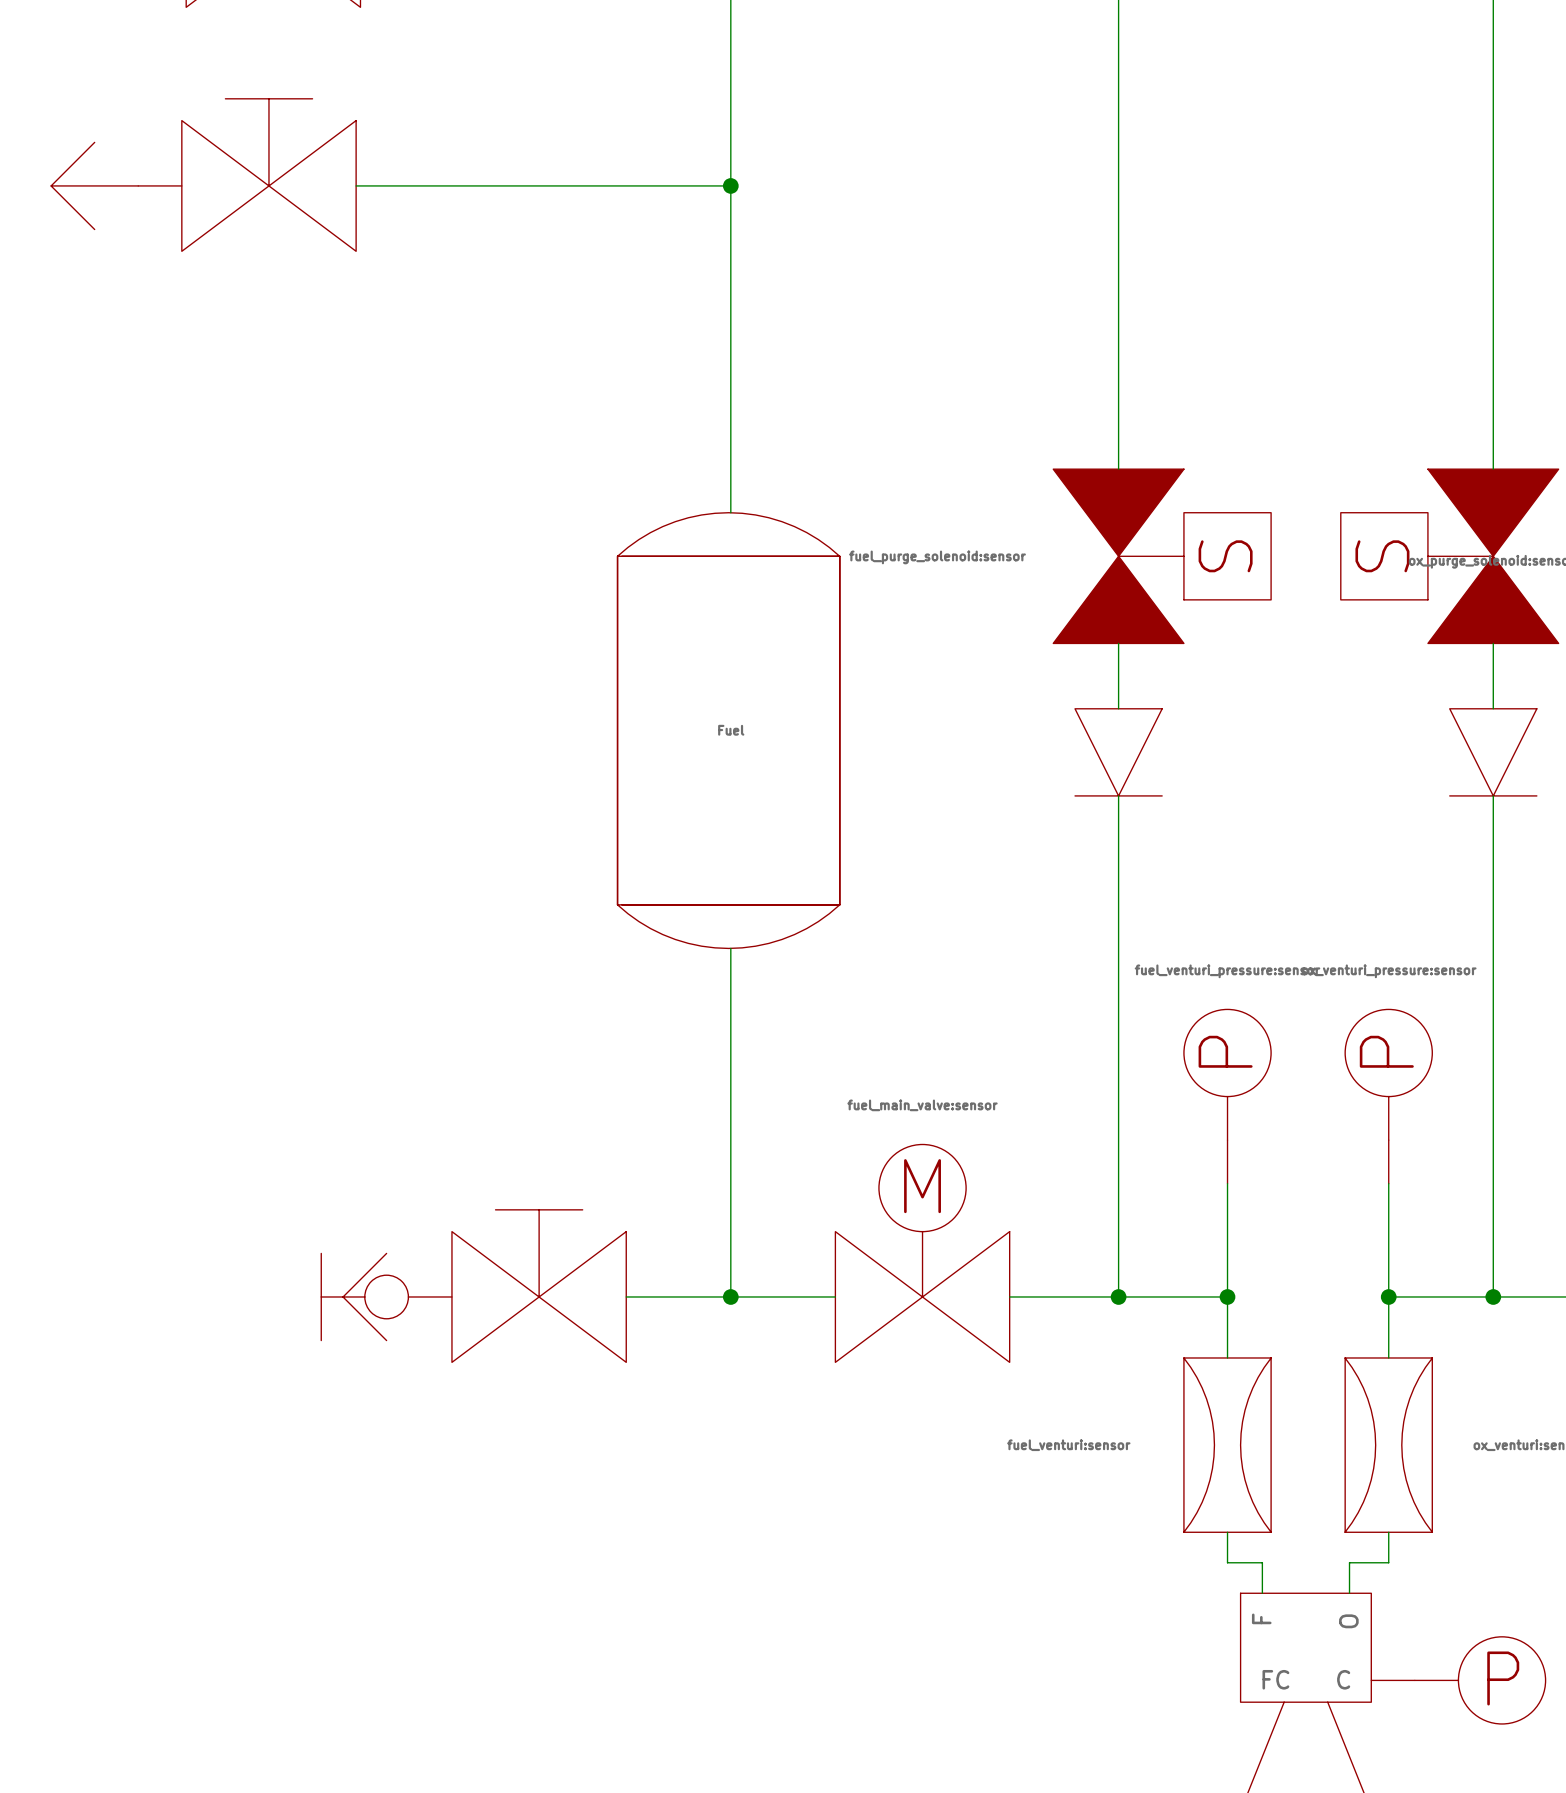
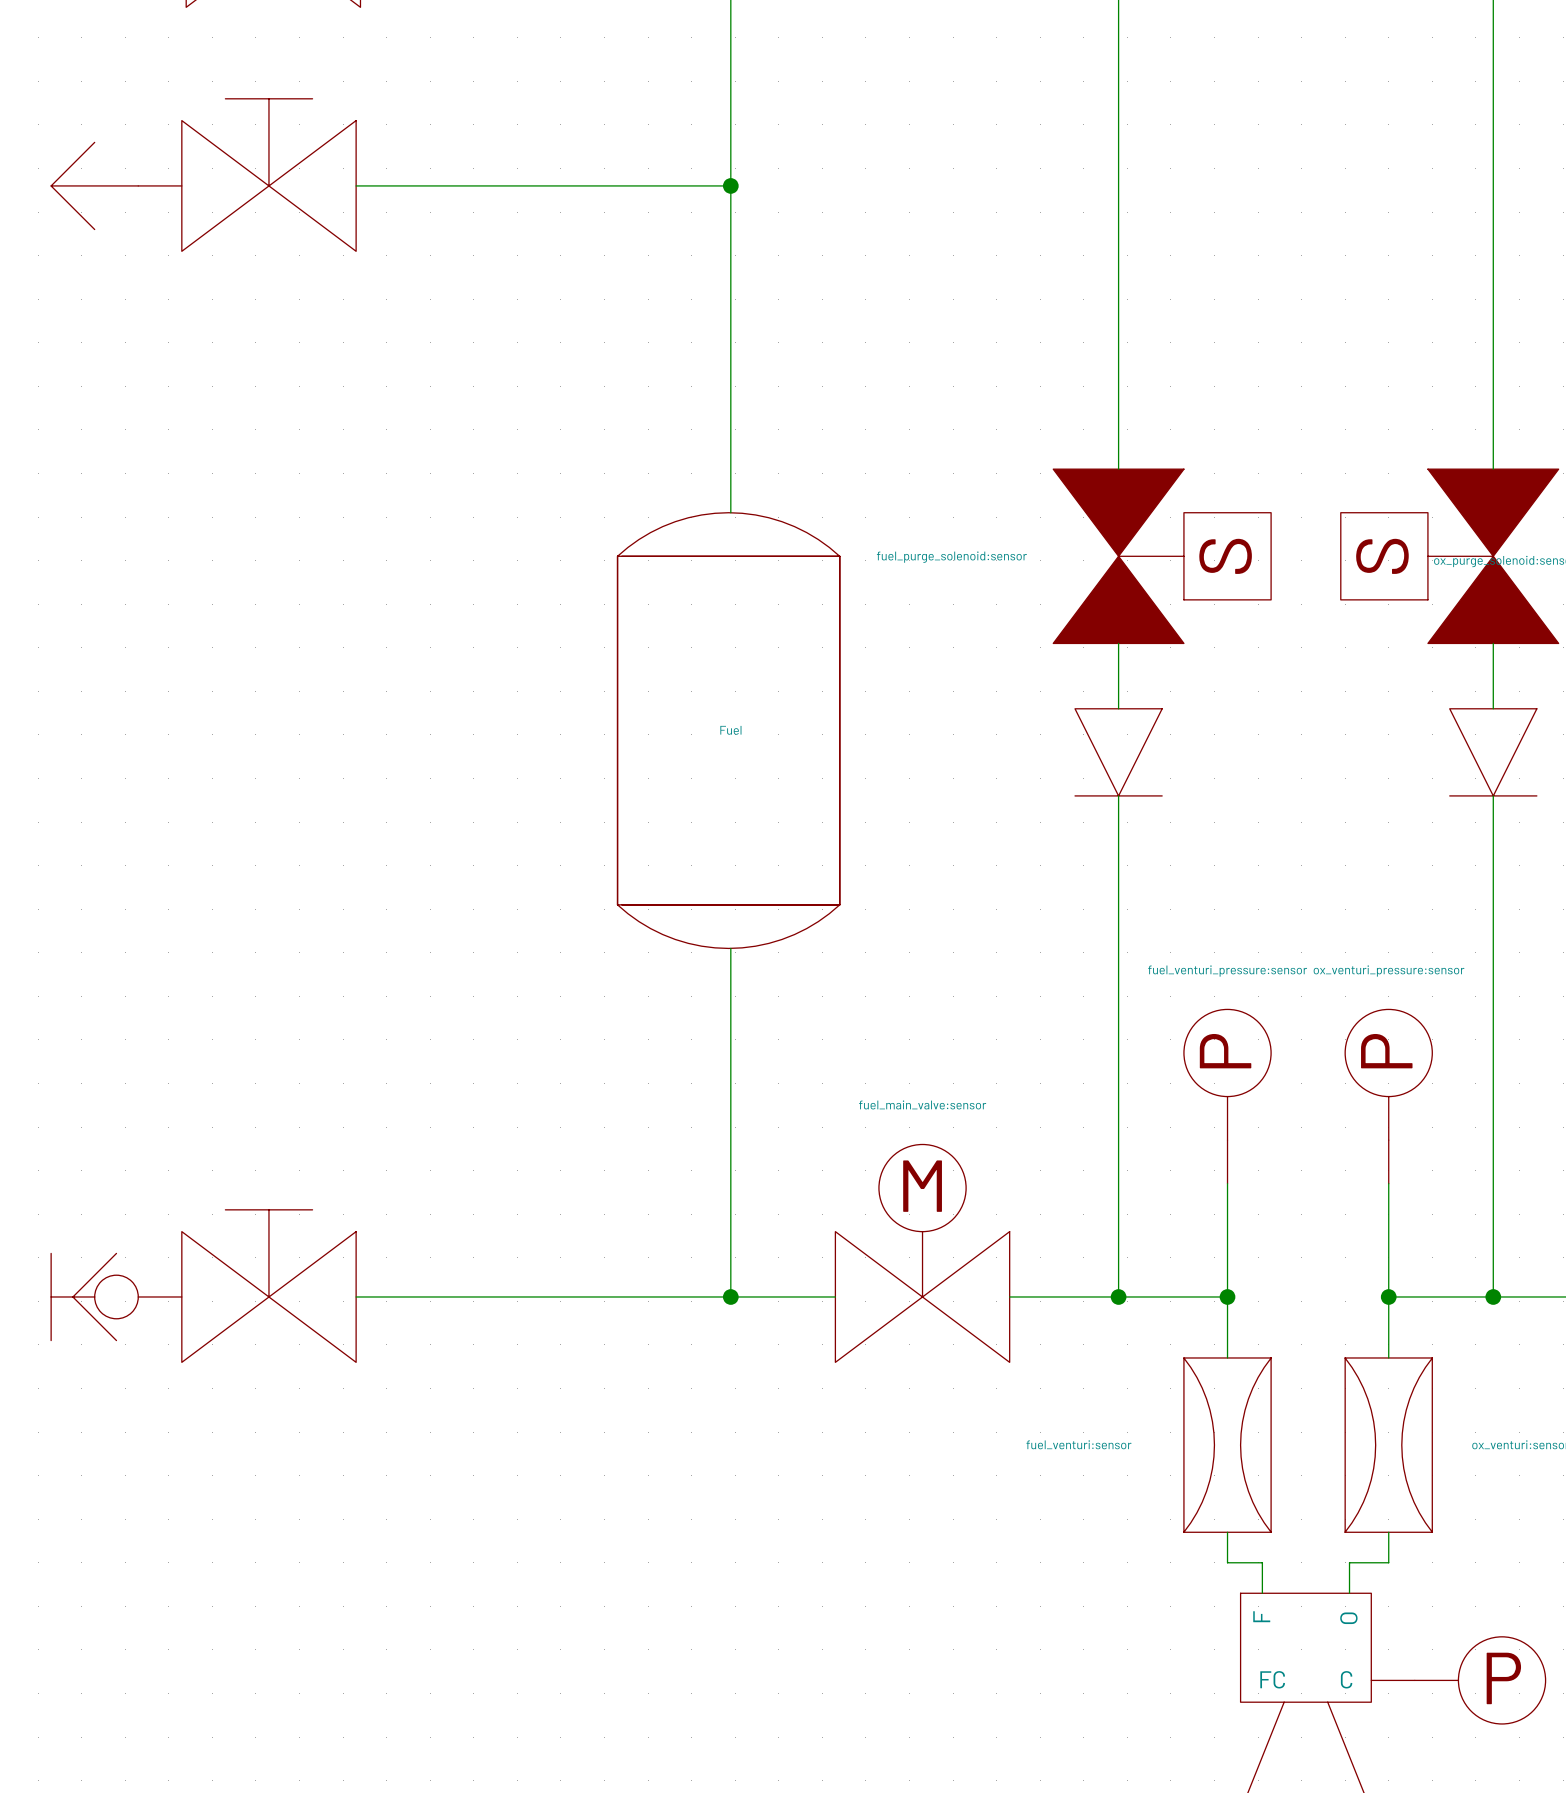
part position: (539, 1286) -> (268, 1286)
wire: none -> (356, 1296) (626, 1296)
part position: (386, 1296) -> (116, 1296)

